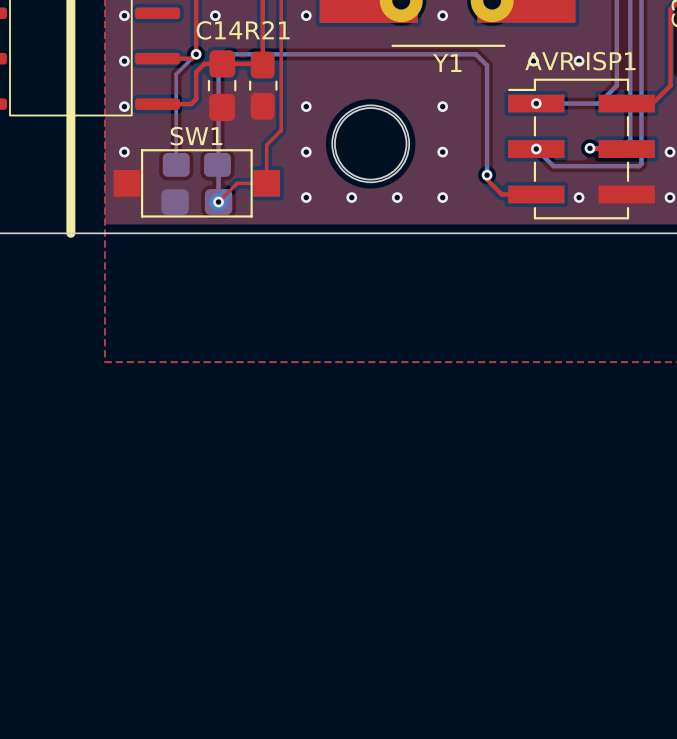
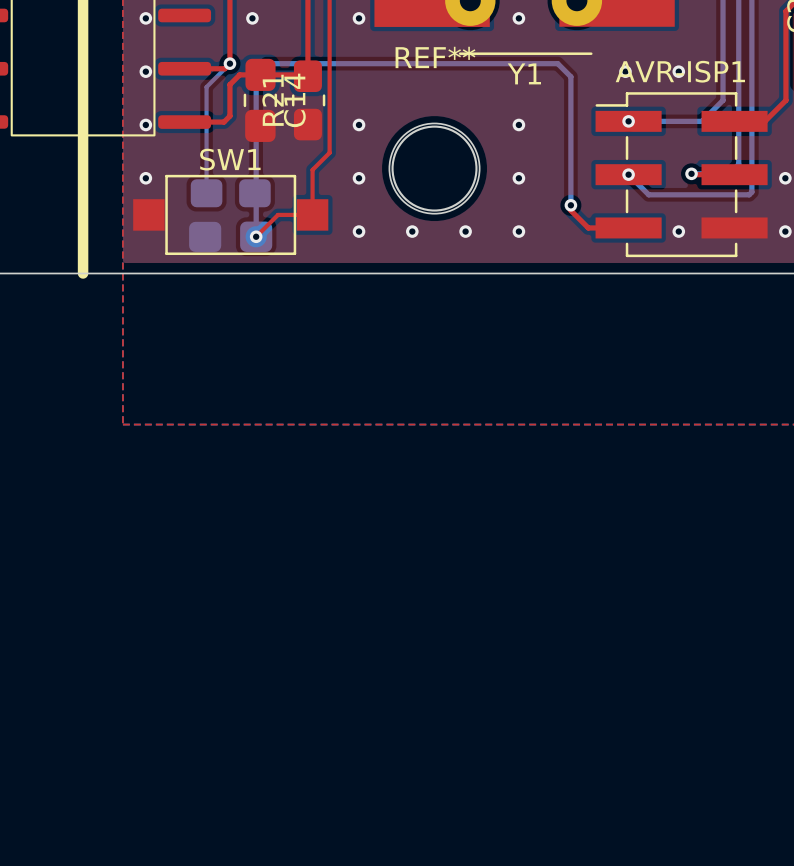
C14 name rotation: 0° (219, 30) -> 90° counterclockwise (294, 100)
C14 name position: C14 (219, 30) -> C14 (294, 100)
R21 name rotation: 0° (267, 30) -> 90° counterclockwise (273, 100)
R21 name position: R21 (267, 30) -> R21 (273, 100)
REF** name: none -> REF** (435, 57)

